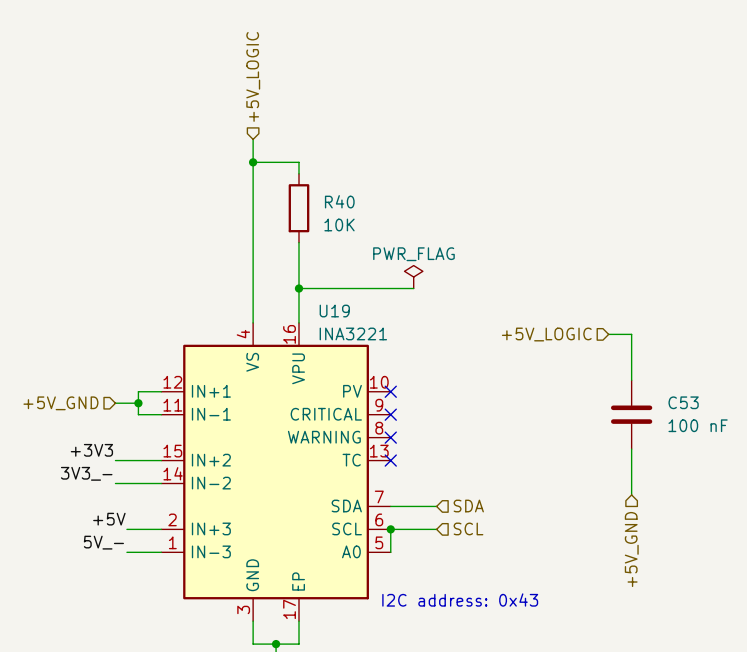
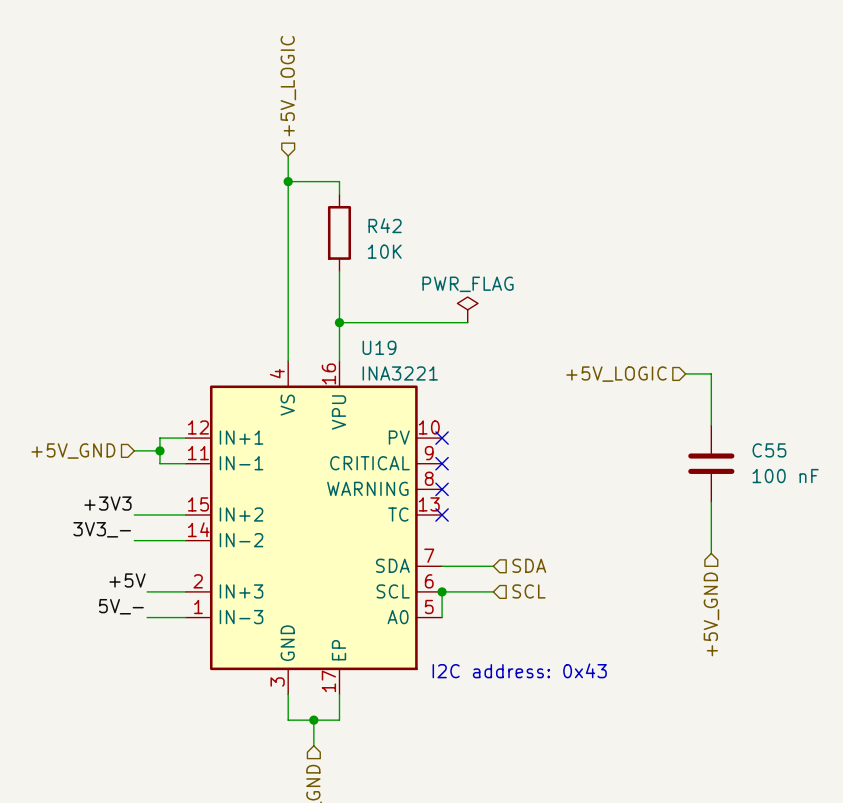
R40 name: R40 (339, 201) -> R42 (385, 225)
C53 name: C53 (683, 402) -> C55 (769, 450)

